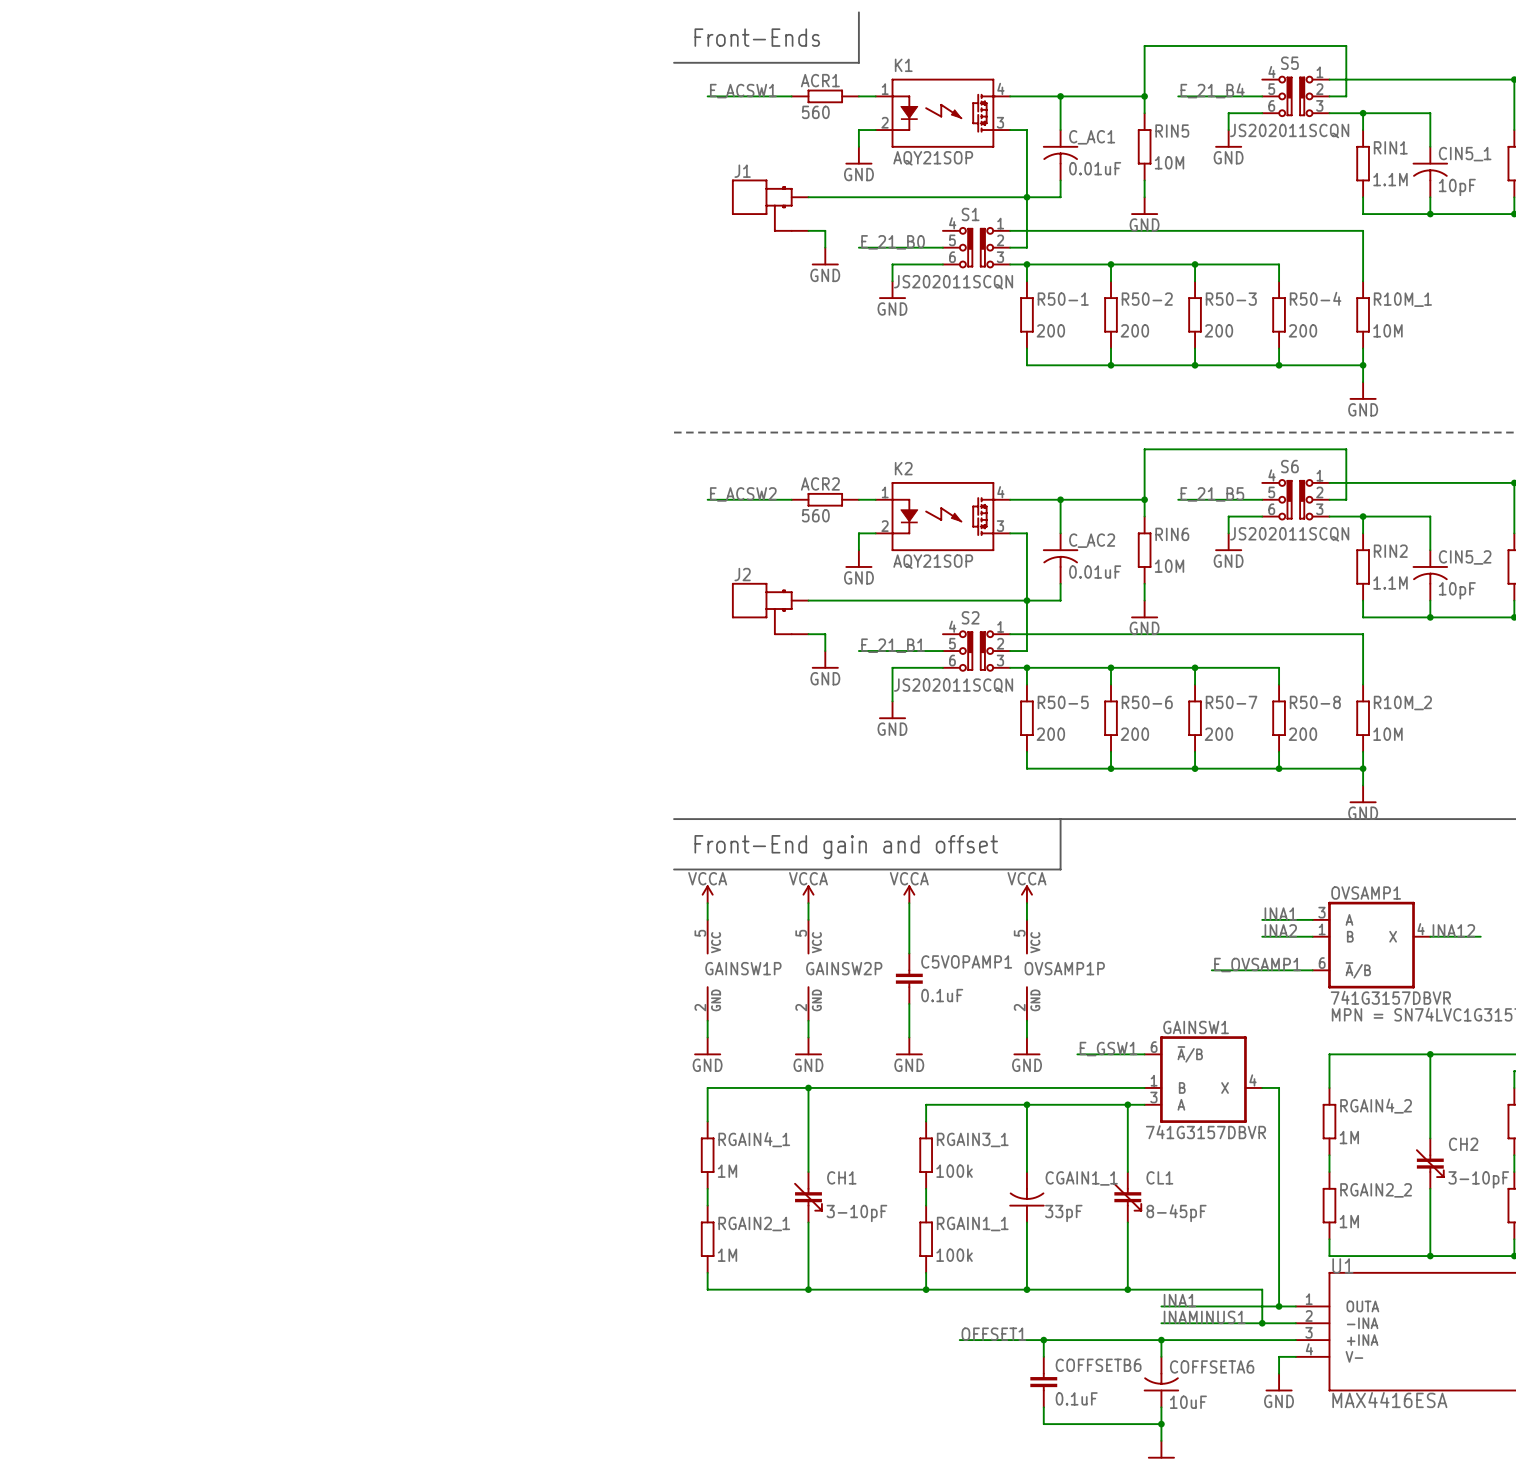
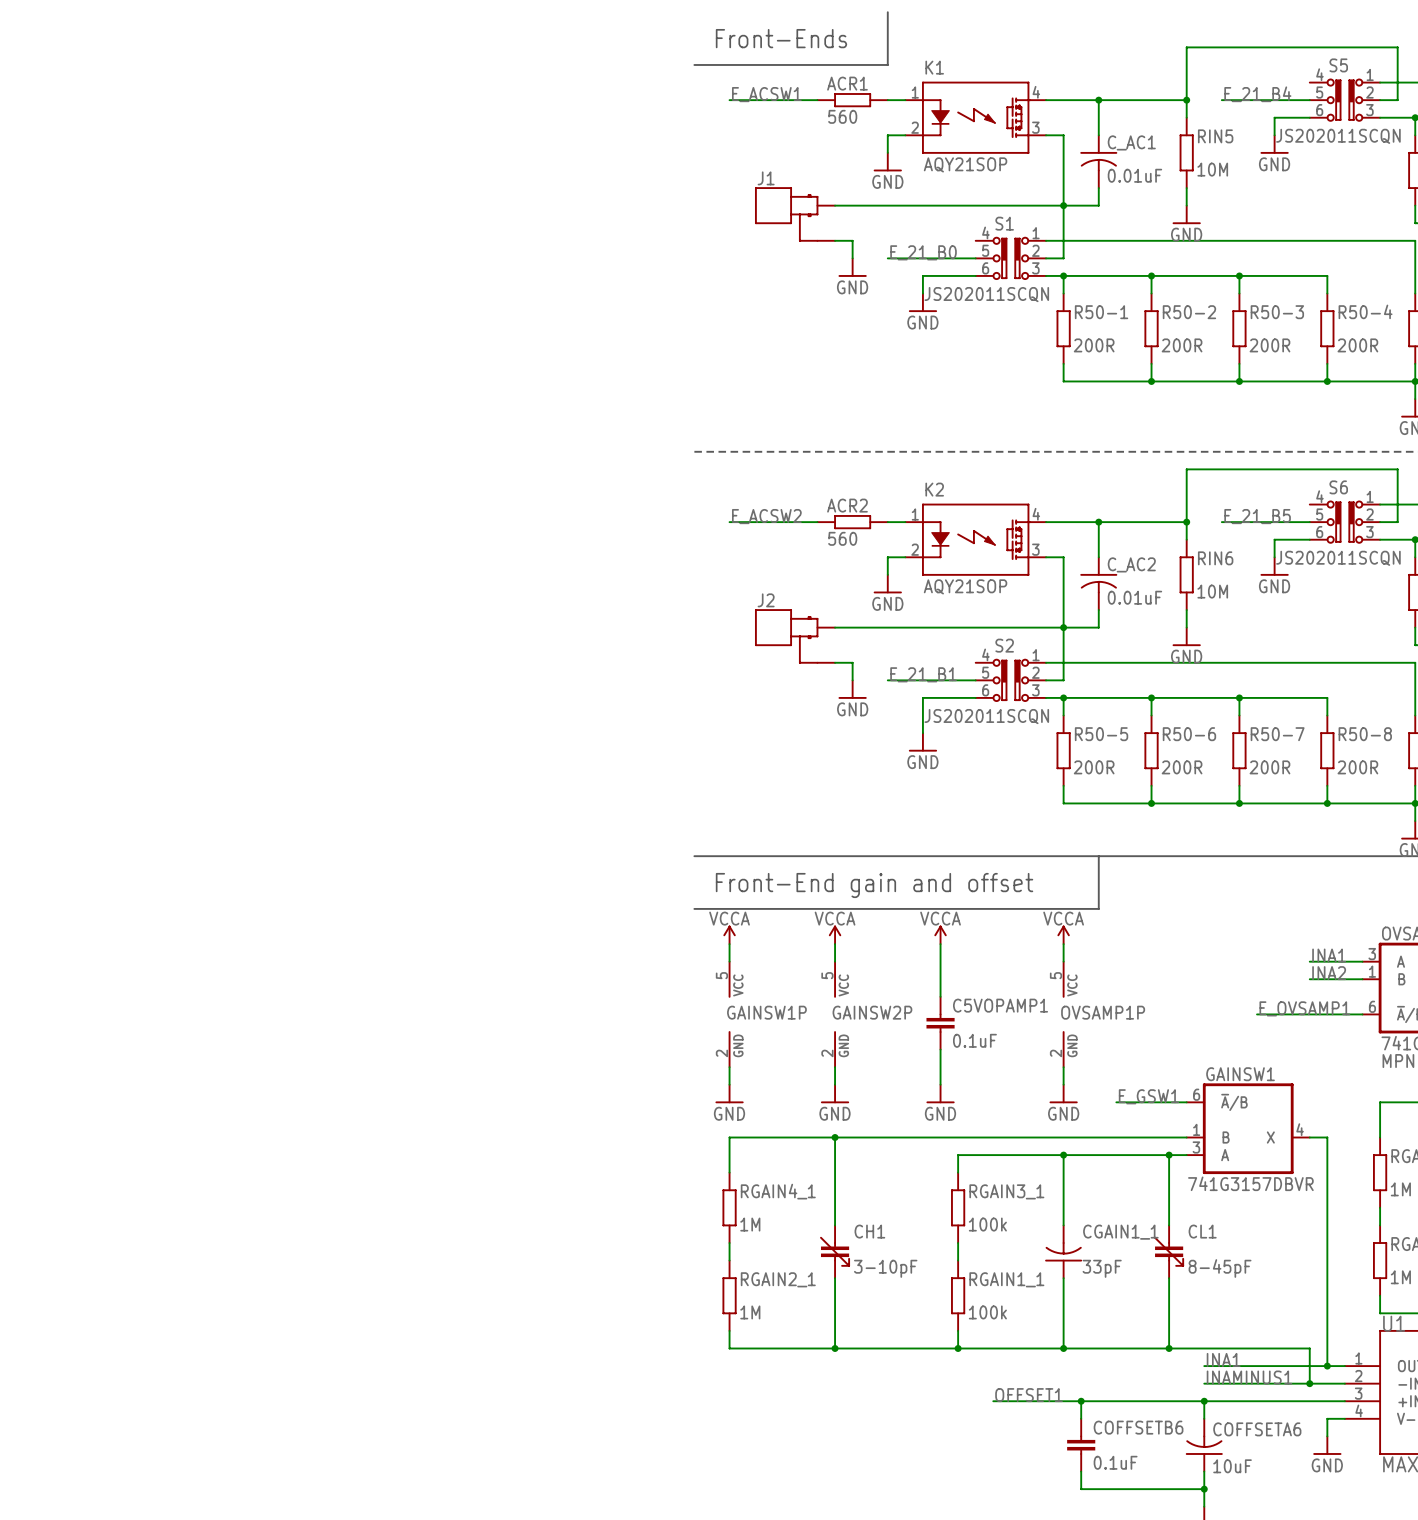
R50-1 value: 200 (1050, 330) -> 200R (1094, 345)
R50-2 value: 200 (1134, 330) -> 200R (1182, 345)
R50-3 value: 200 (1218, 330) -> 200R (1269, 345)
R50-4 value: 200 (1302, 330) -> 200R (1357, 345)
R50-5 value: 200 (1050, 734) -> 200R (1094, 767)
R50-6 value: 200 (1134, 734) -> 200R (1182, 767)
R50-7 value: 200 (1218, 734) -> 200R (1269, 767)
R50-8 value: 200 (1302, 734) -> 200R (1357, 767)

